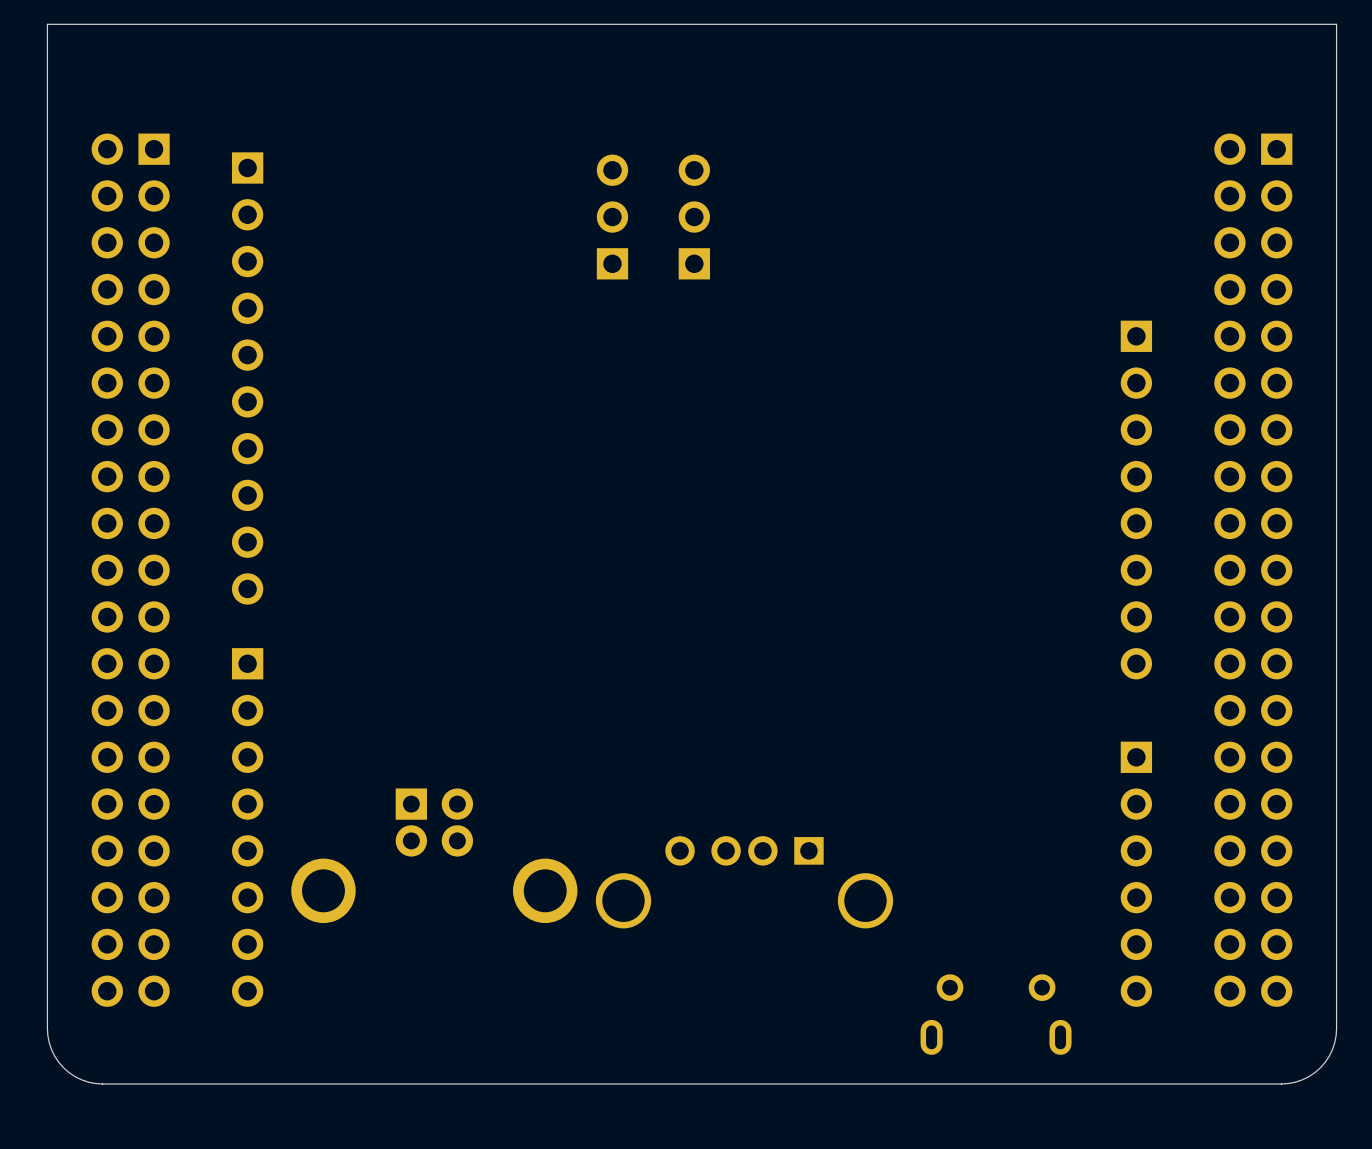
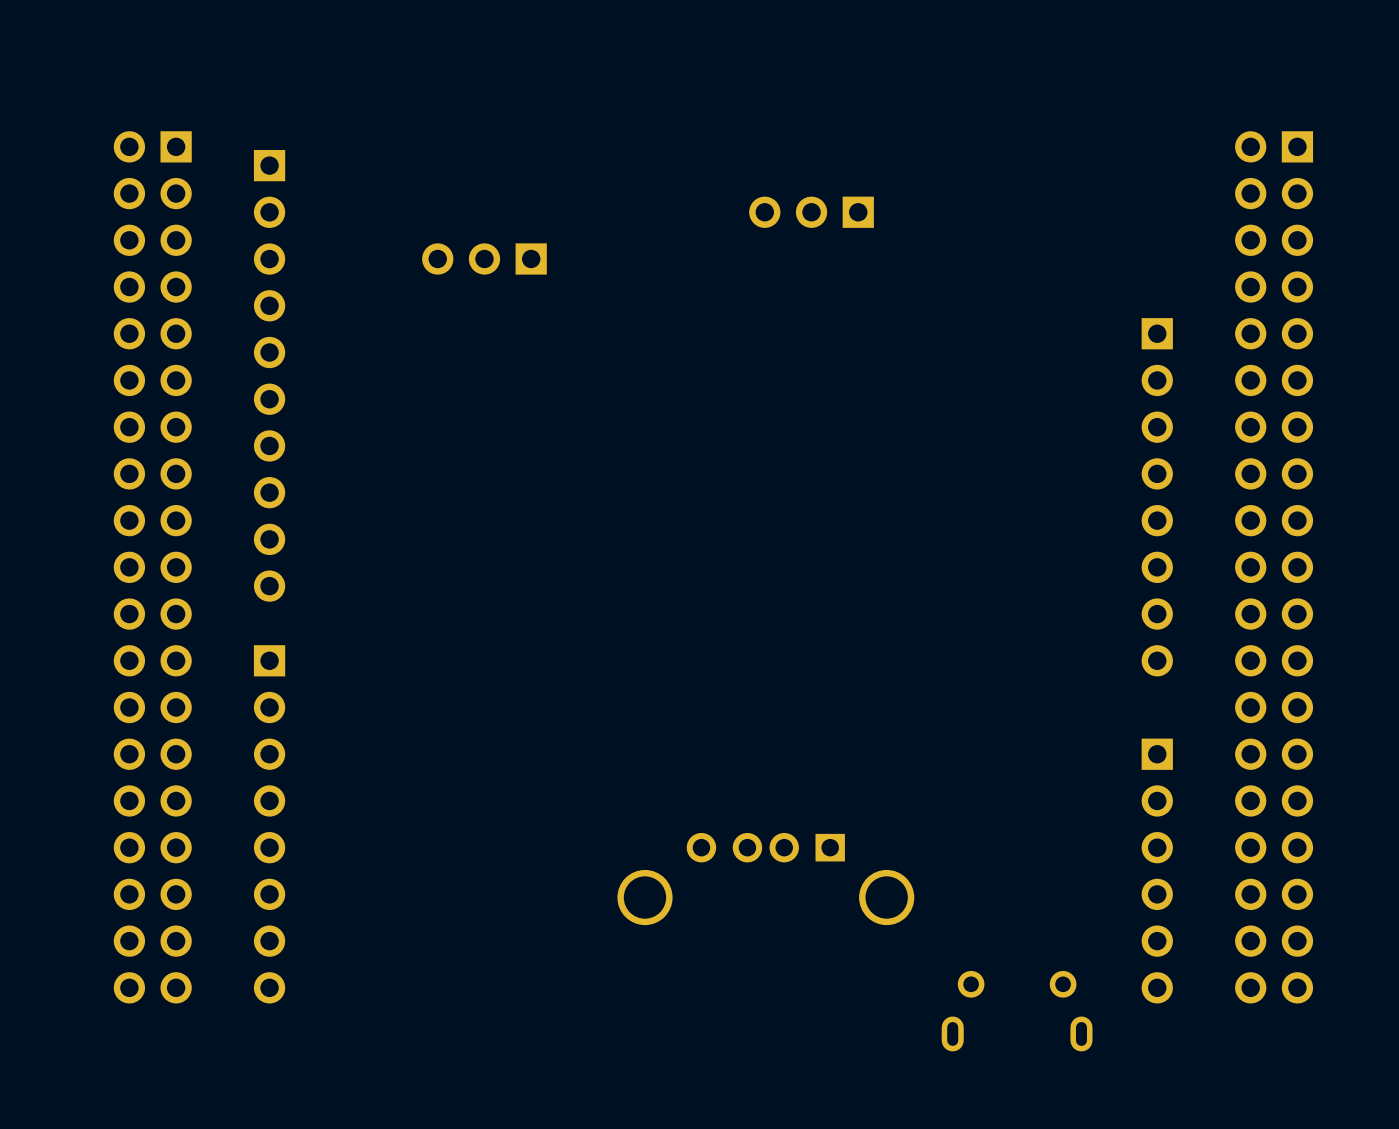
board edge: (1336, 24) (1336, 1028) (1334, 1043) (1329, 1056) (1314, 1072) (1302, 1079) (1281, 1084) (102, 1084) (81, 1079) (69, 1072) (58, 1062) (51, 1049) (47, 1028) (47, 24) (1336, 24) -> none
part: none -> (811, 212)
part: (612, 217) -> none
part: (694, 217) -> none
part: none -> (484, 258)
part: (434, 855) -> none

